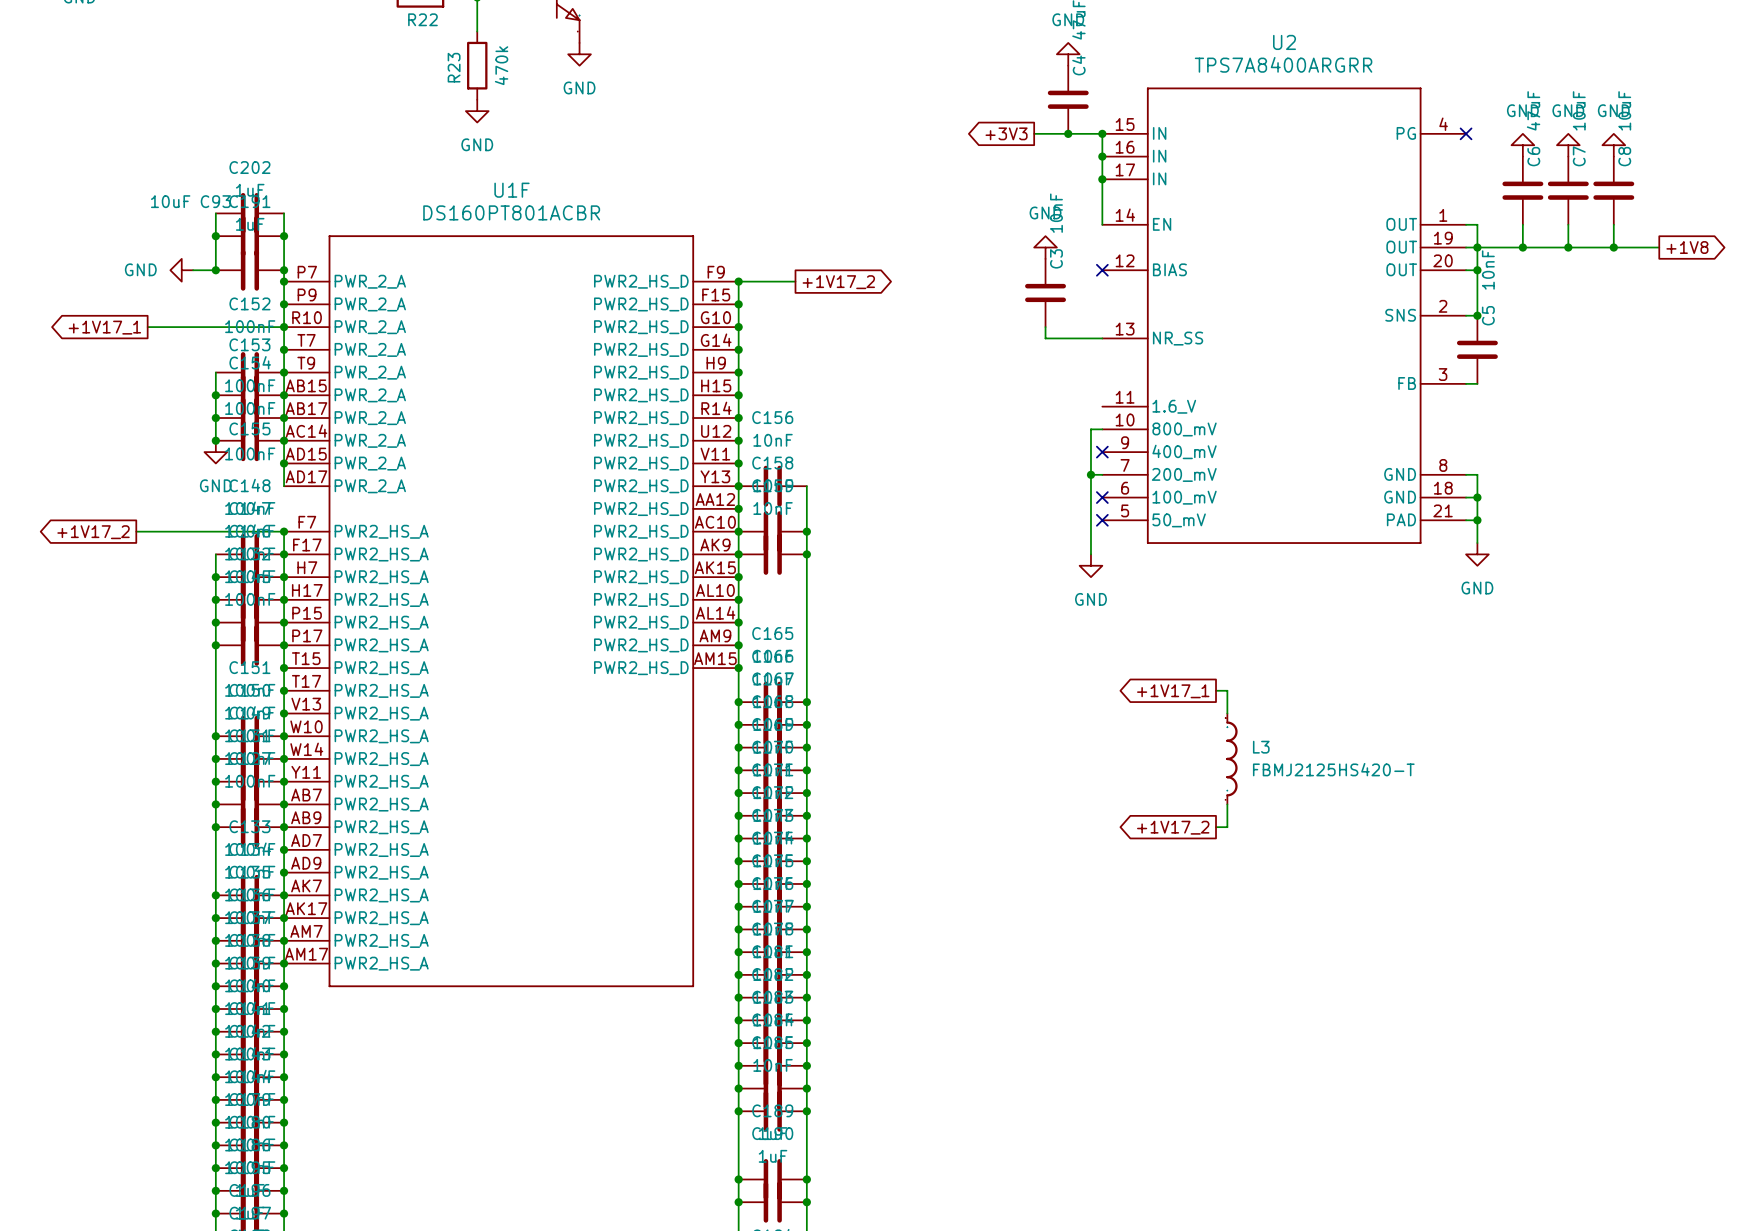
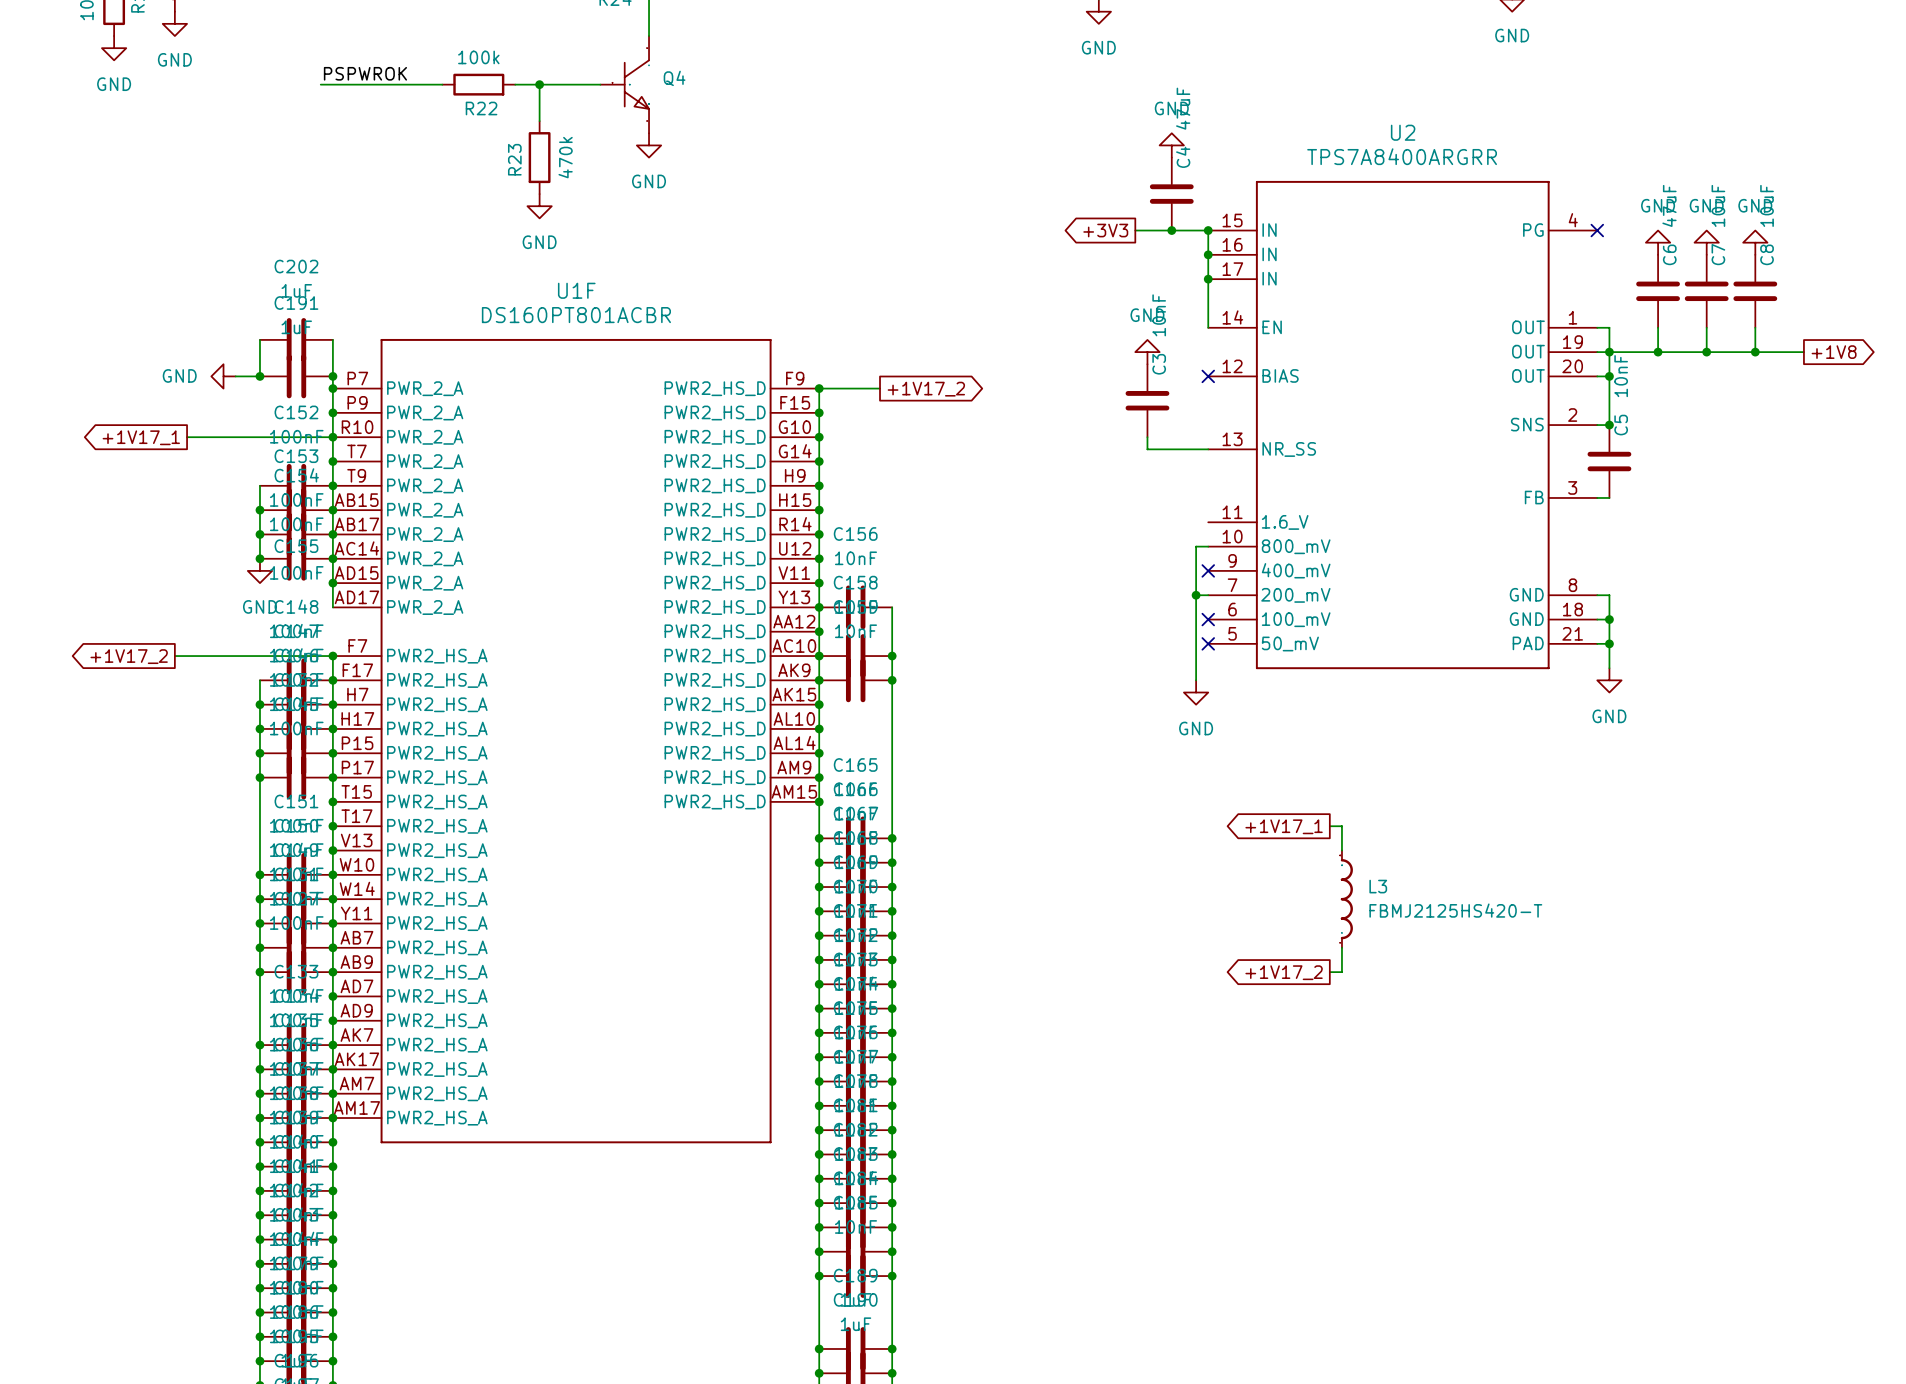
wire: (215, 213) (215, 236) -> none
C93: 10uF (249, 213) -> none
wire: (284, 213) (284, 236) -> none
junction: (215, 236) -> none
junction: (284, 236) -> none

